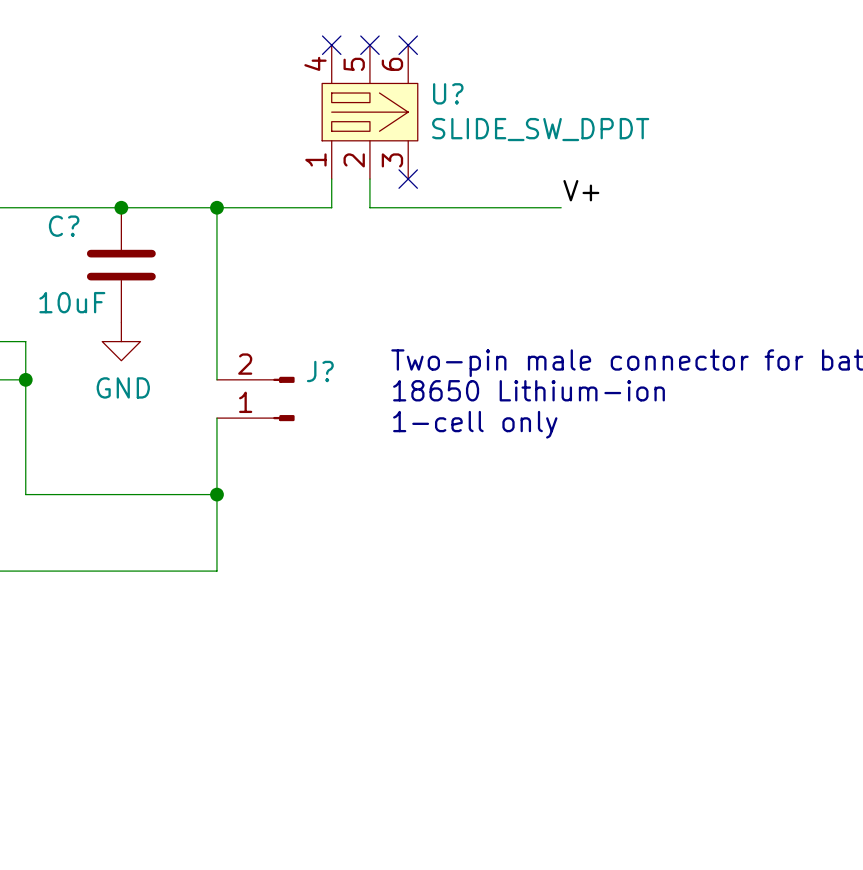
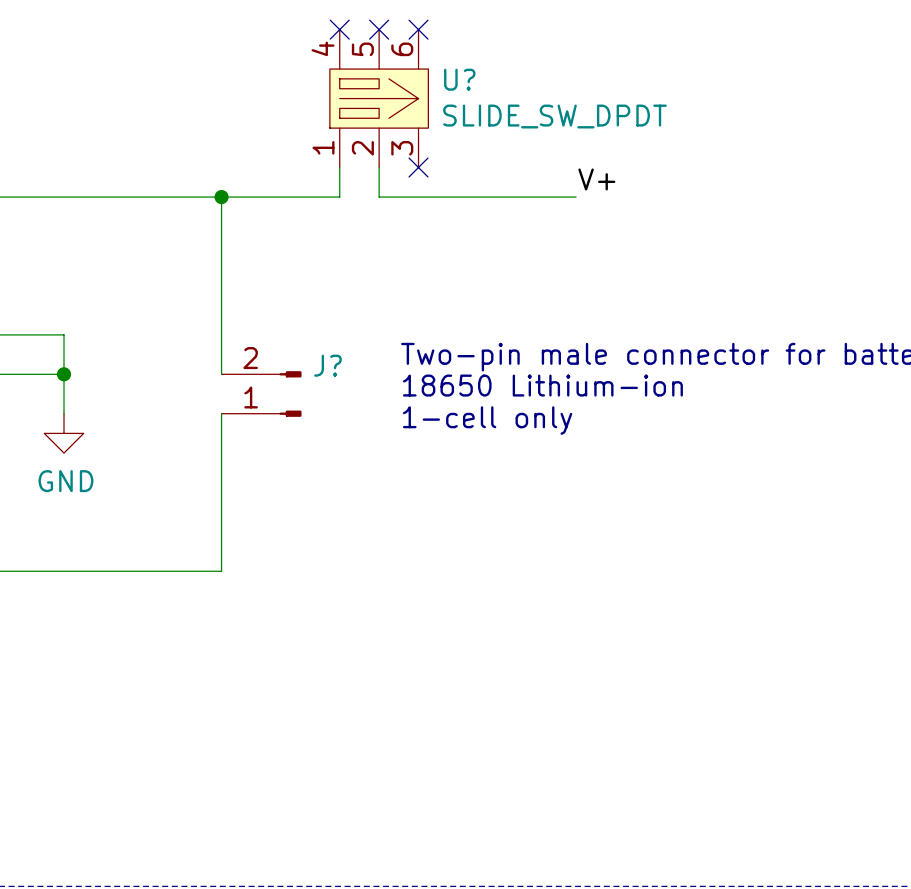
junction: (121, 207) -> none
C?: 10uF (121, 265) -> none
wire: (25, 341) (25, 494) (216, 494) -> (24, 334) (64, 334) (64, 413)
power symbol position: GND (121, 341) -> GND (64, 433)
wire: none -> (24, 374) (64, 374)
junction position: (25, 379) -> (64, 374)
junction: (216, 494) -> none

